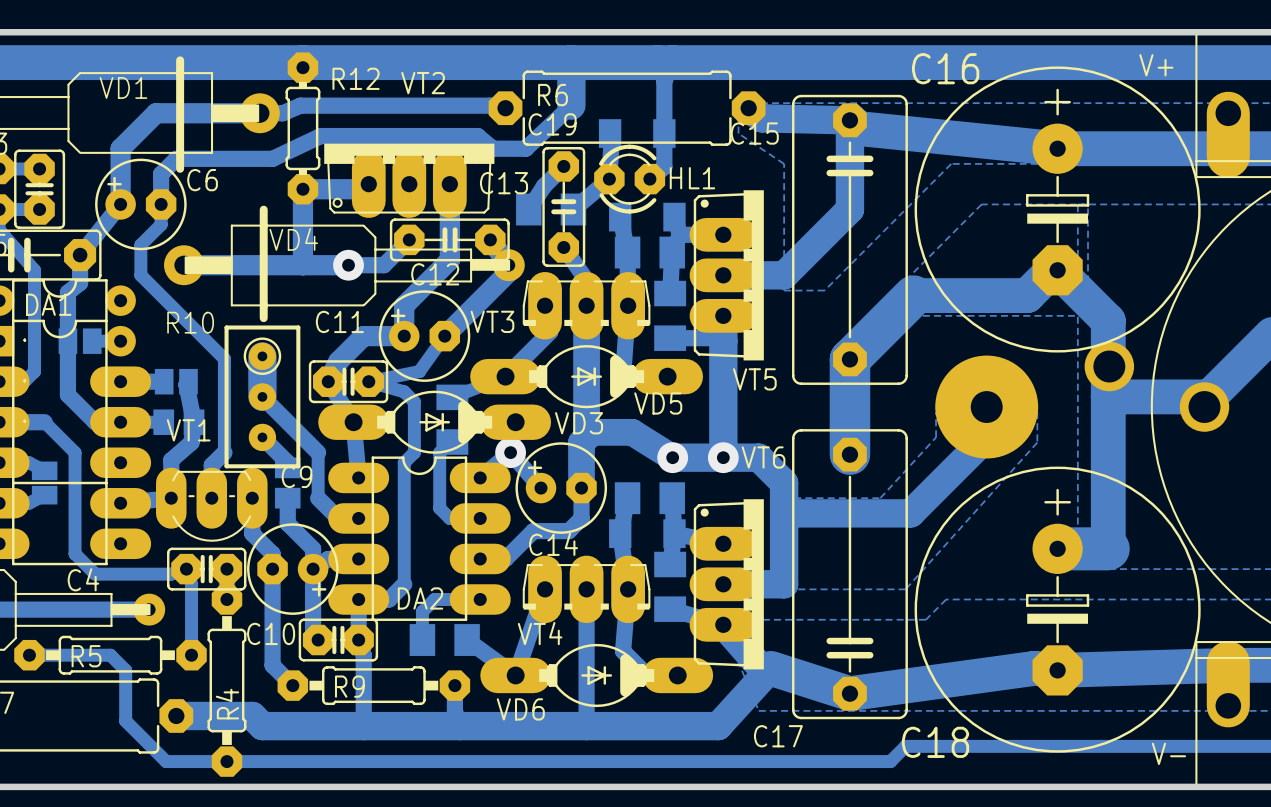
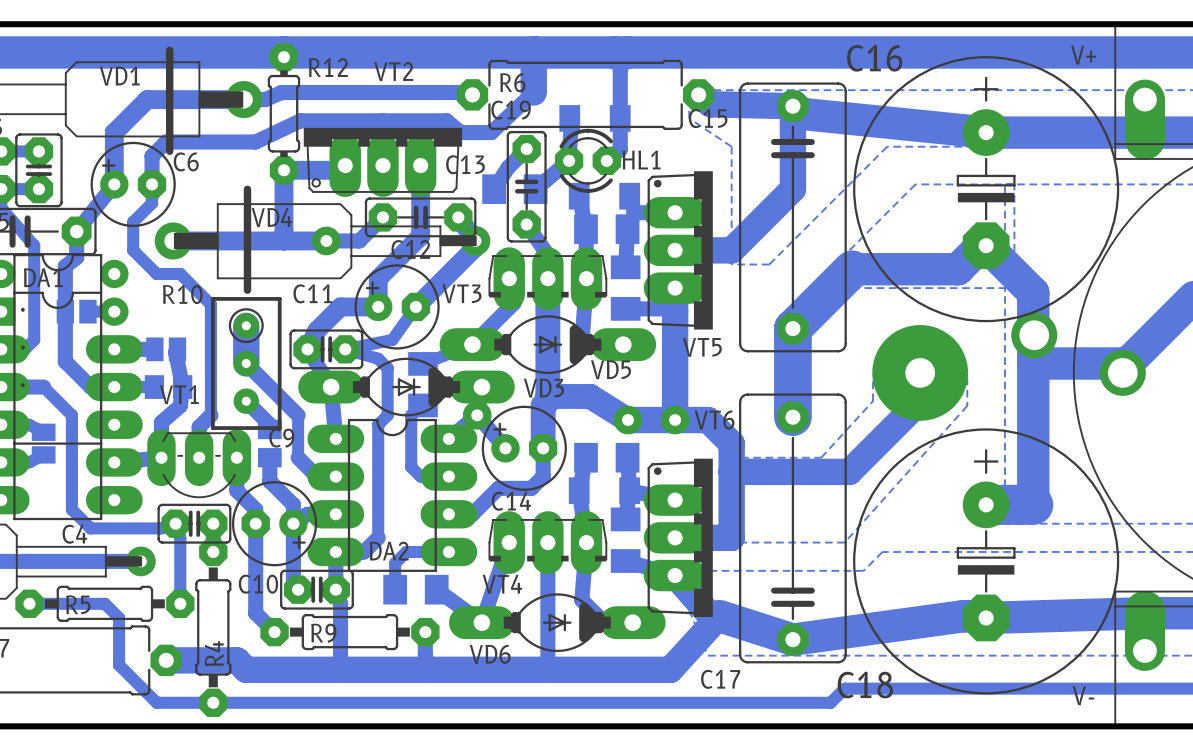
bottom track: (166, 300) (224, 358) -> (156, 273) (180, 273) (210, 304) (210, 328)

